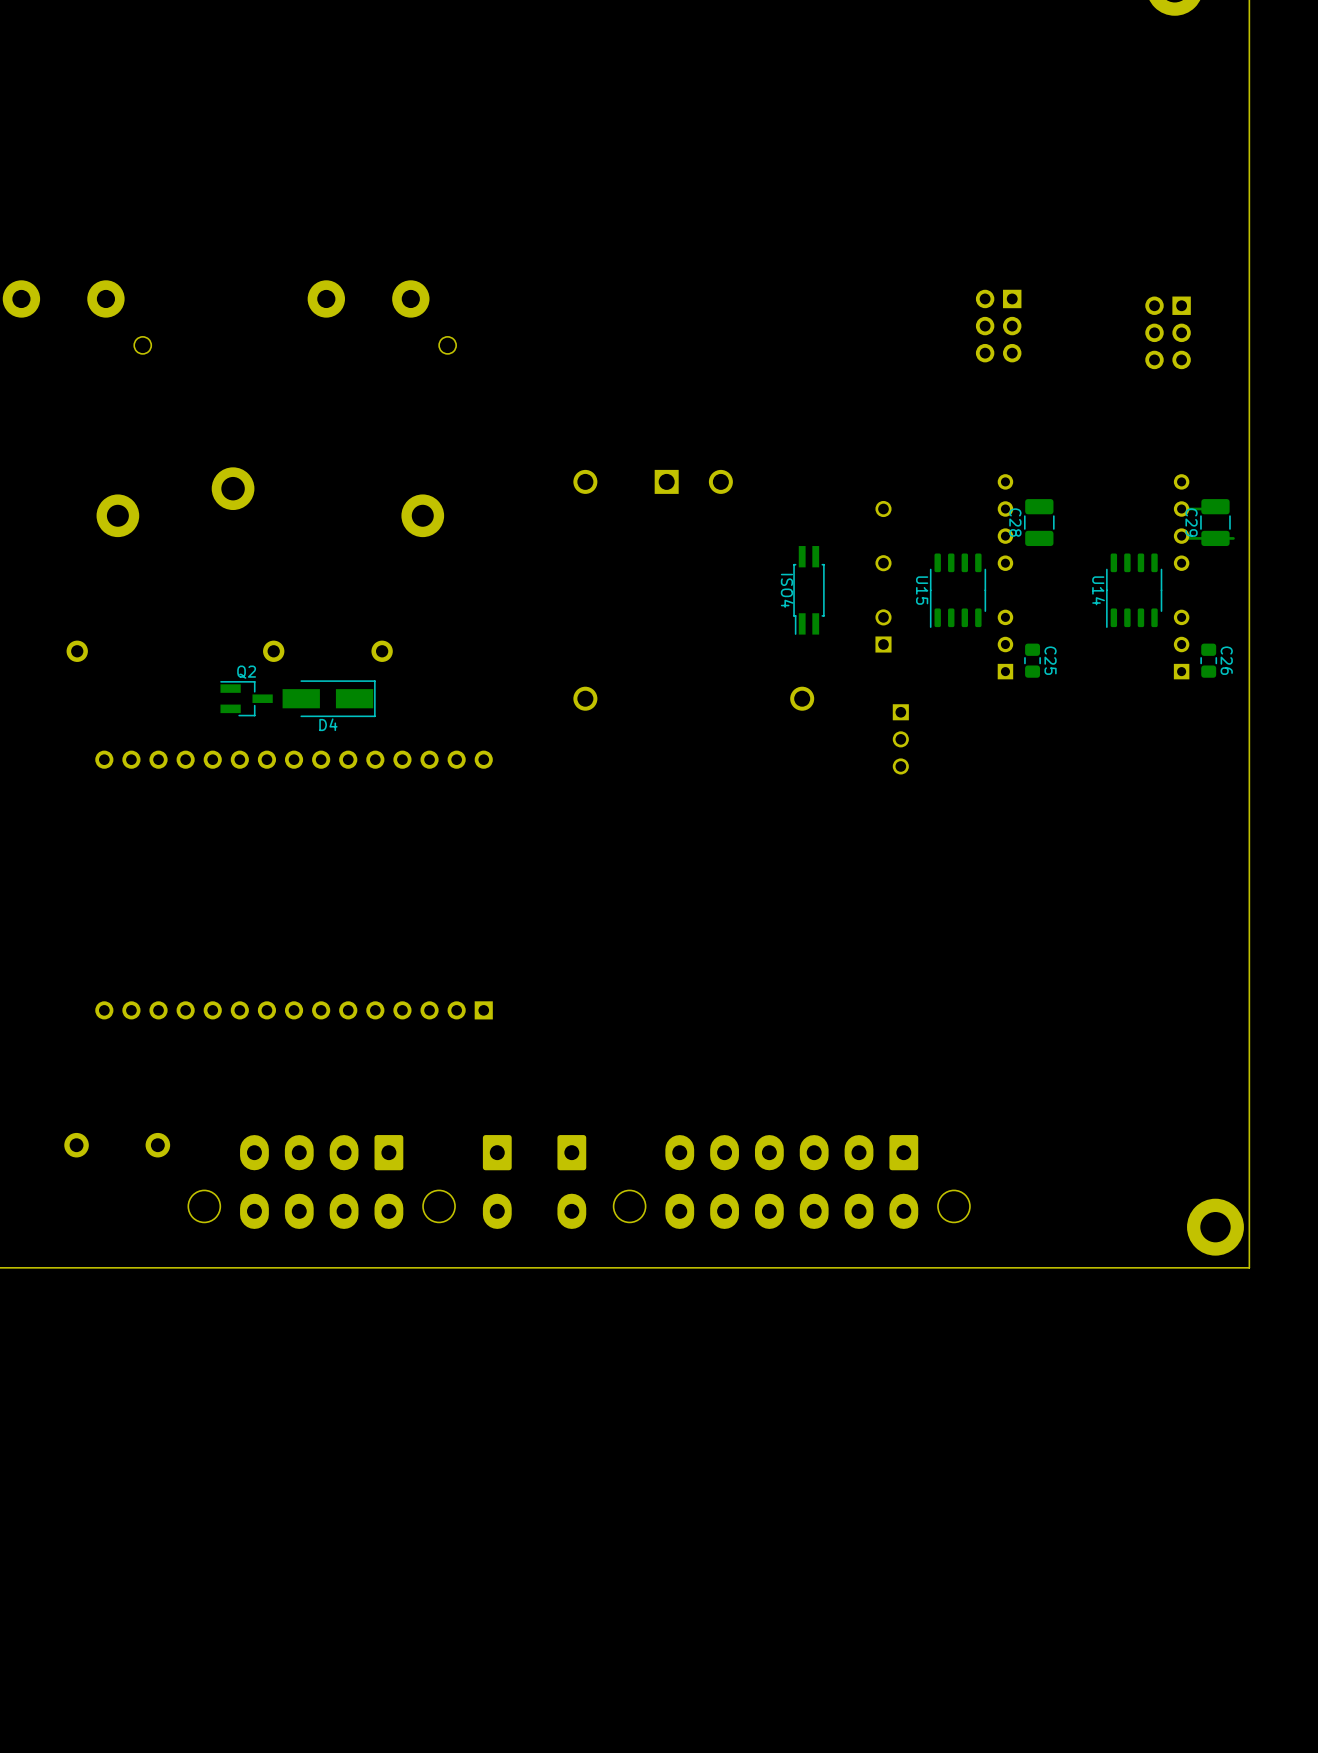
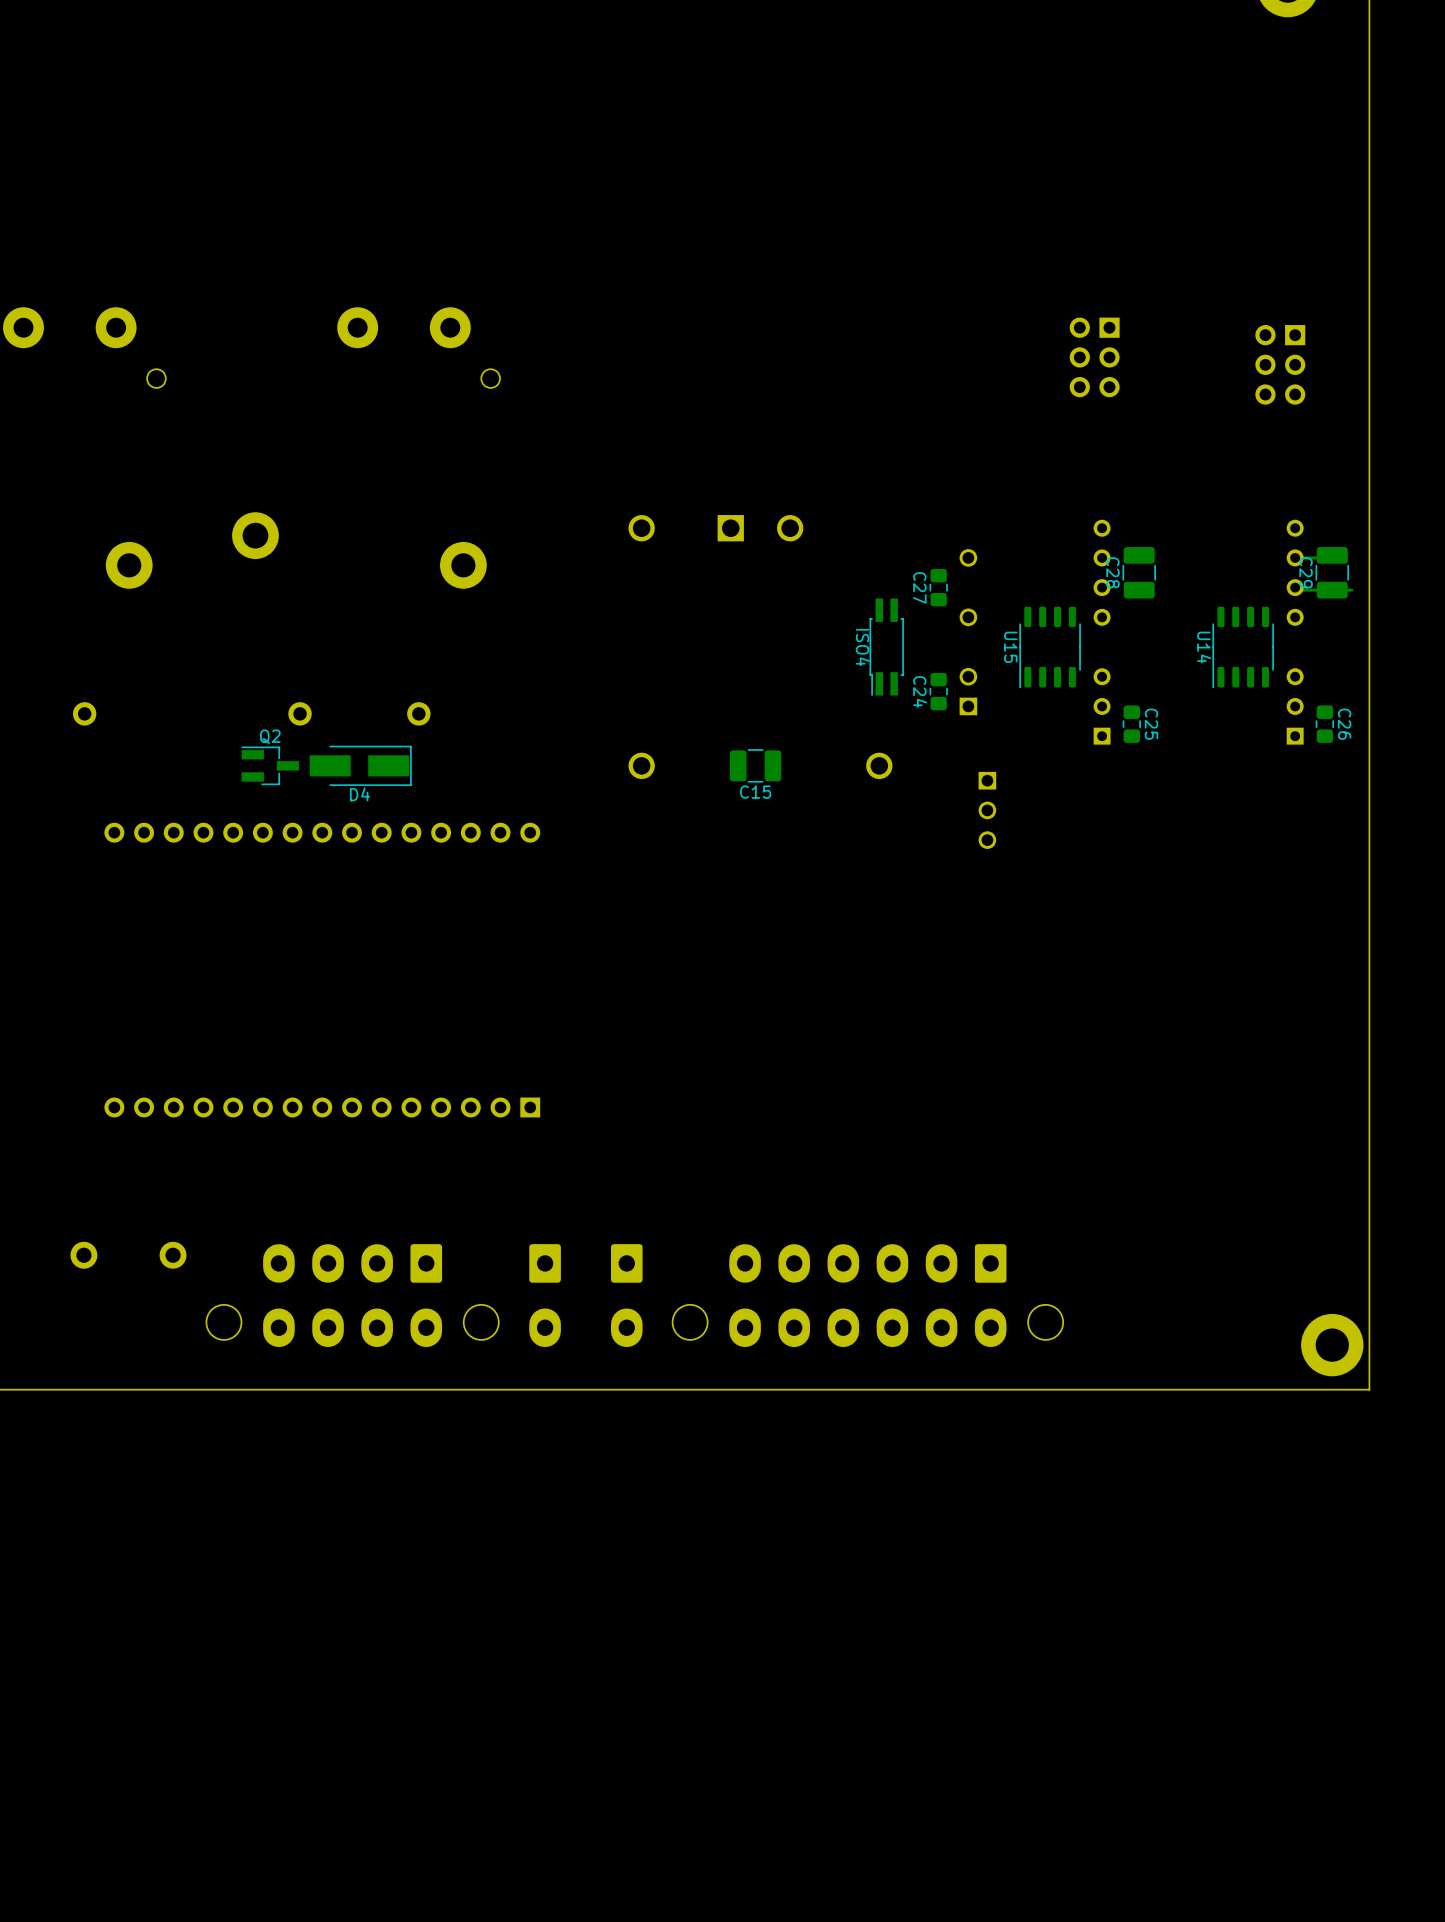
C27: none -> (938, 587)
C24: none -> (938, 691)
C15: none -> (755, 765)

